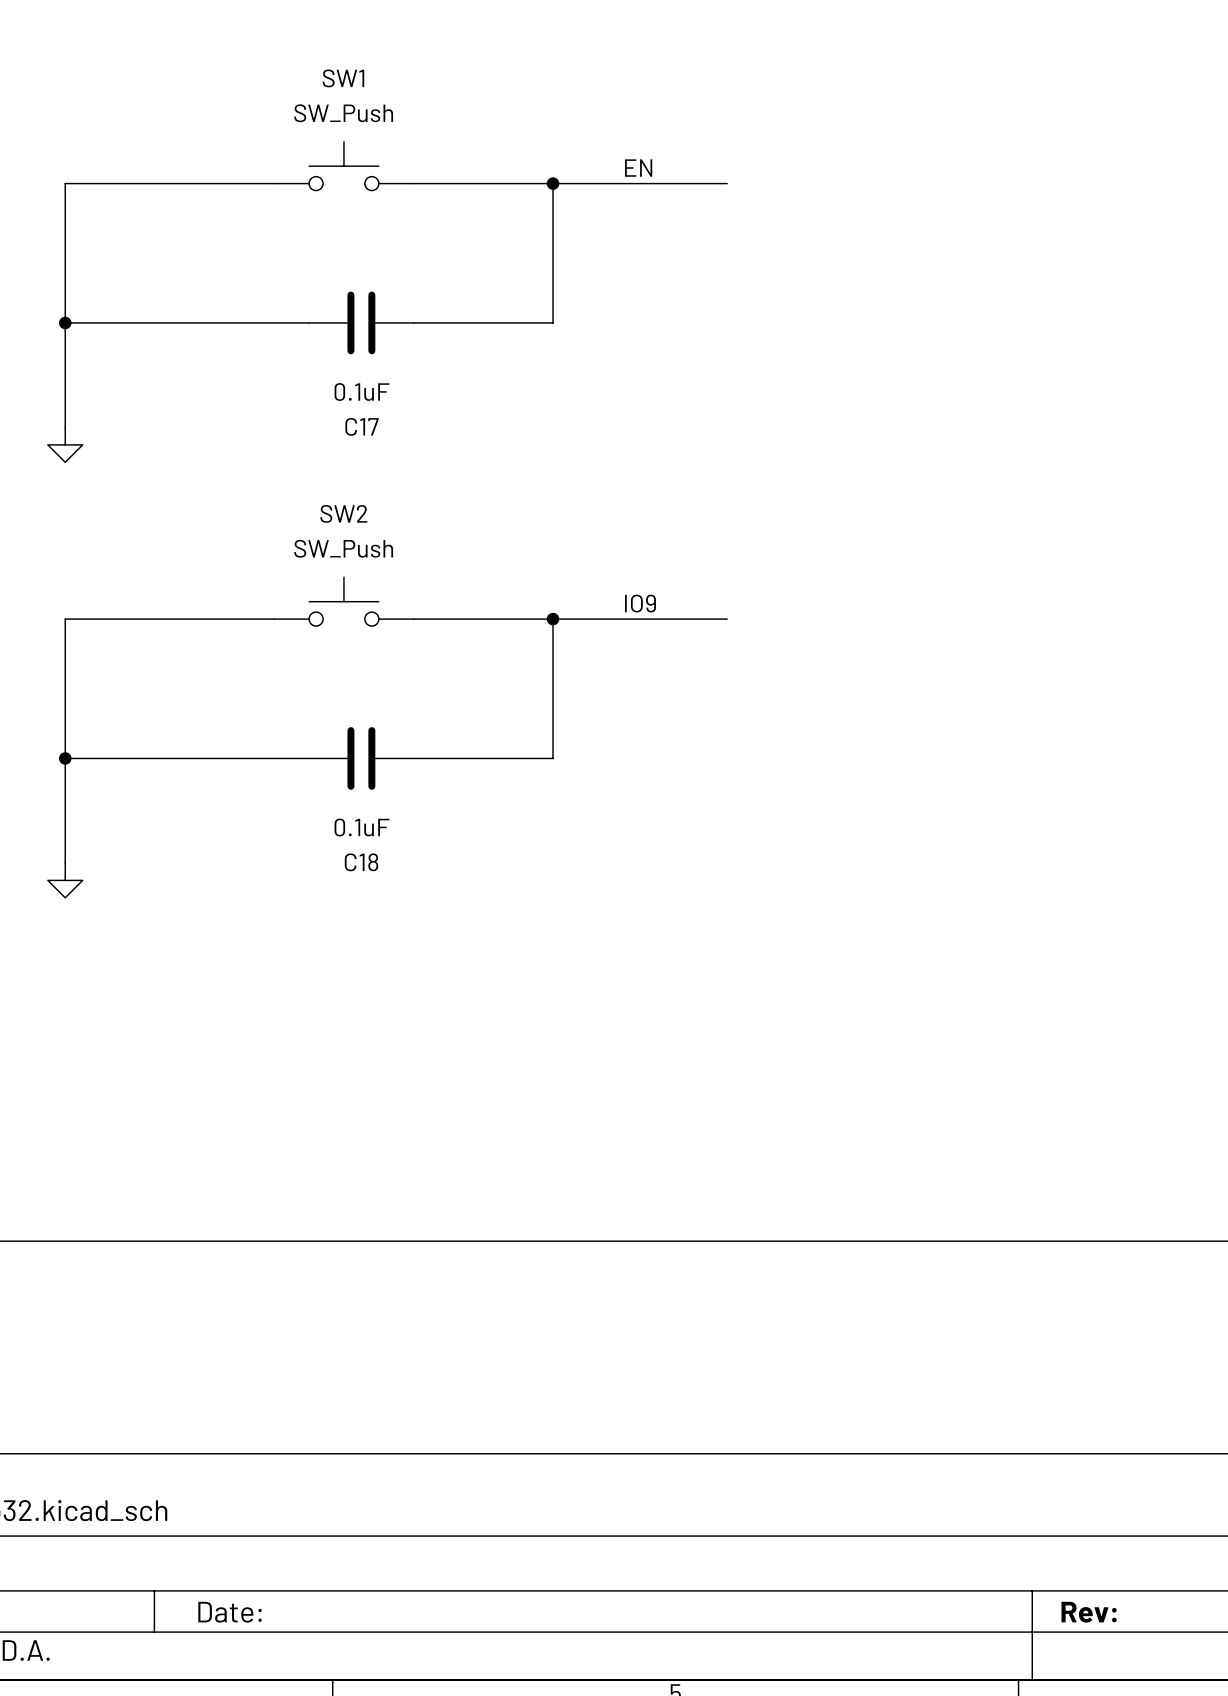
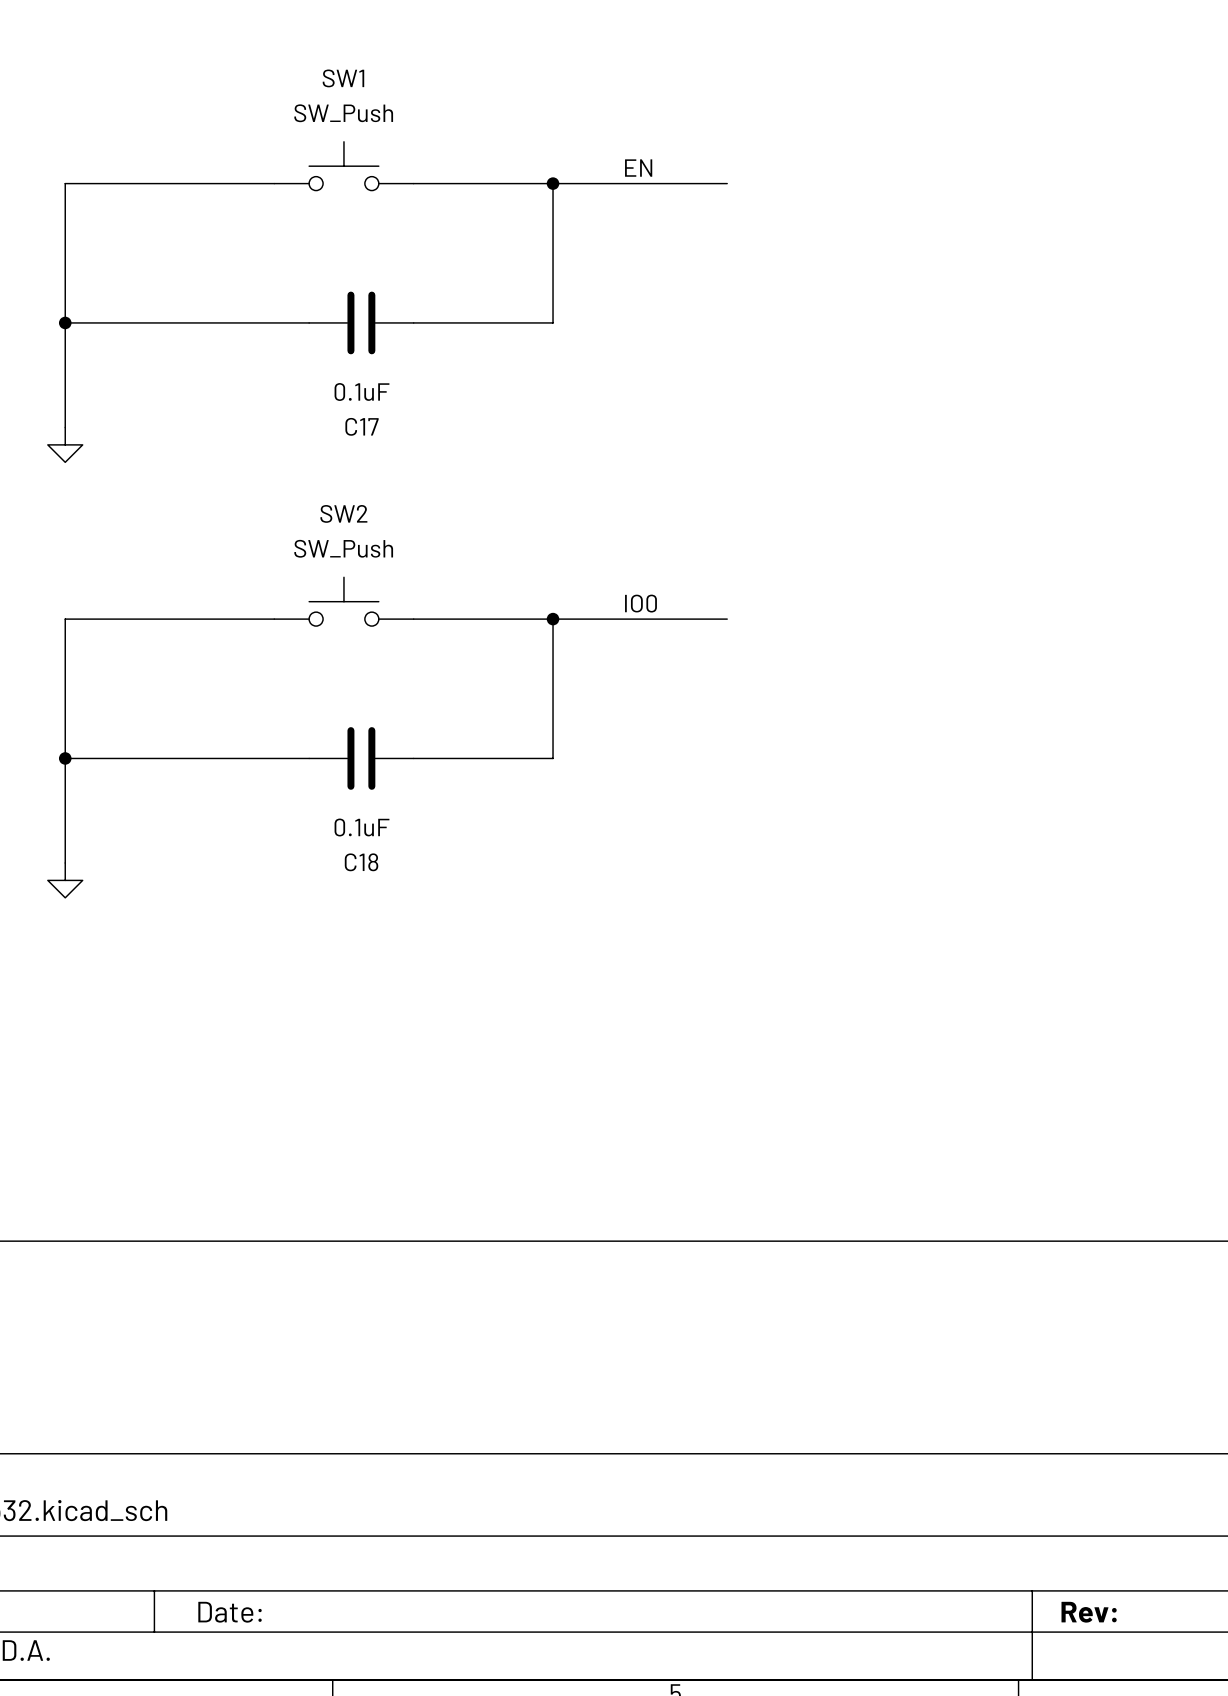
label: IO9 (640, 603) -> IO0 (640, 603)

